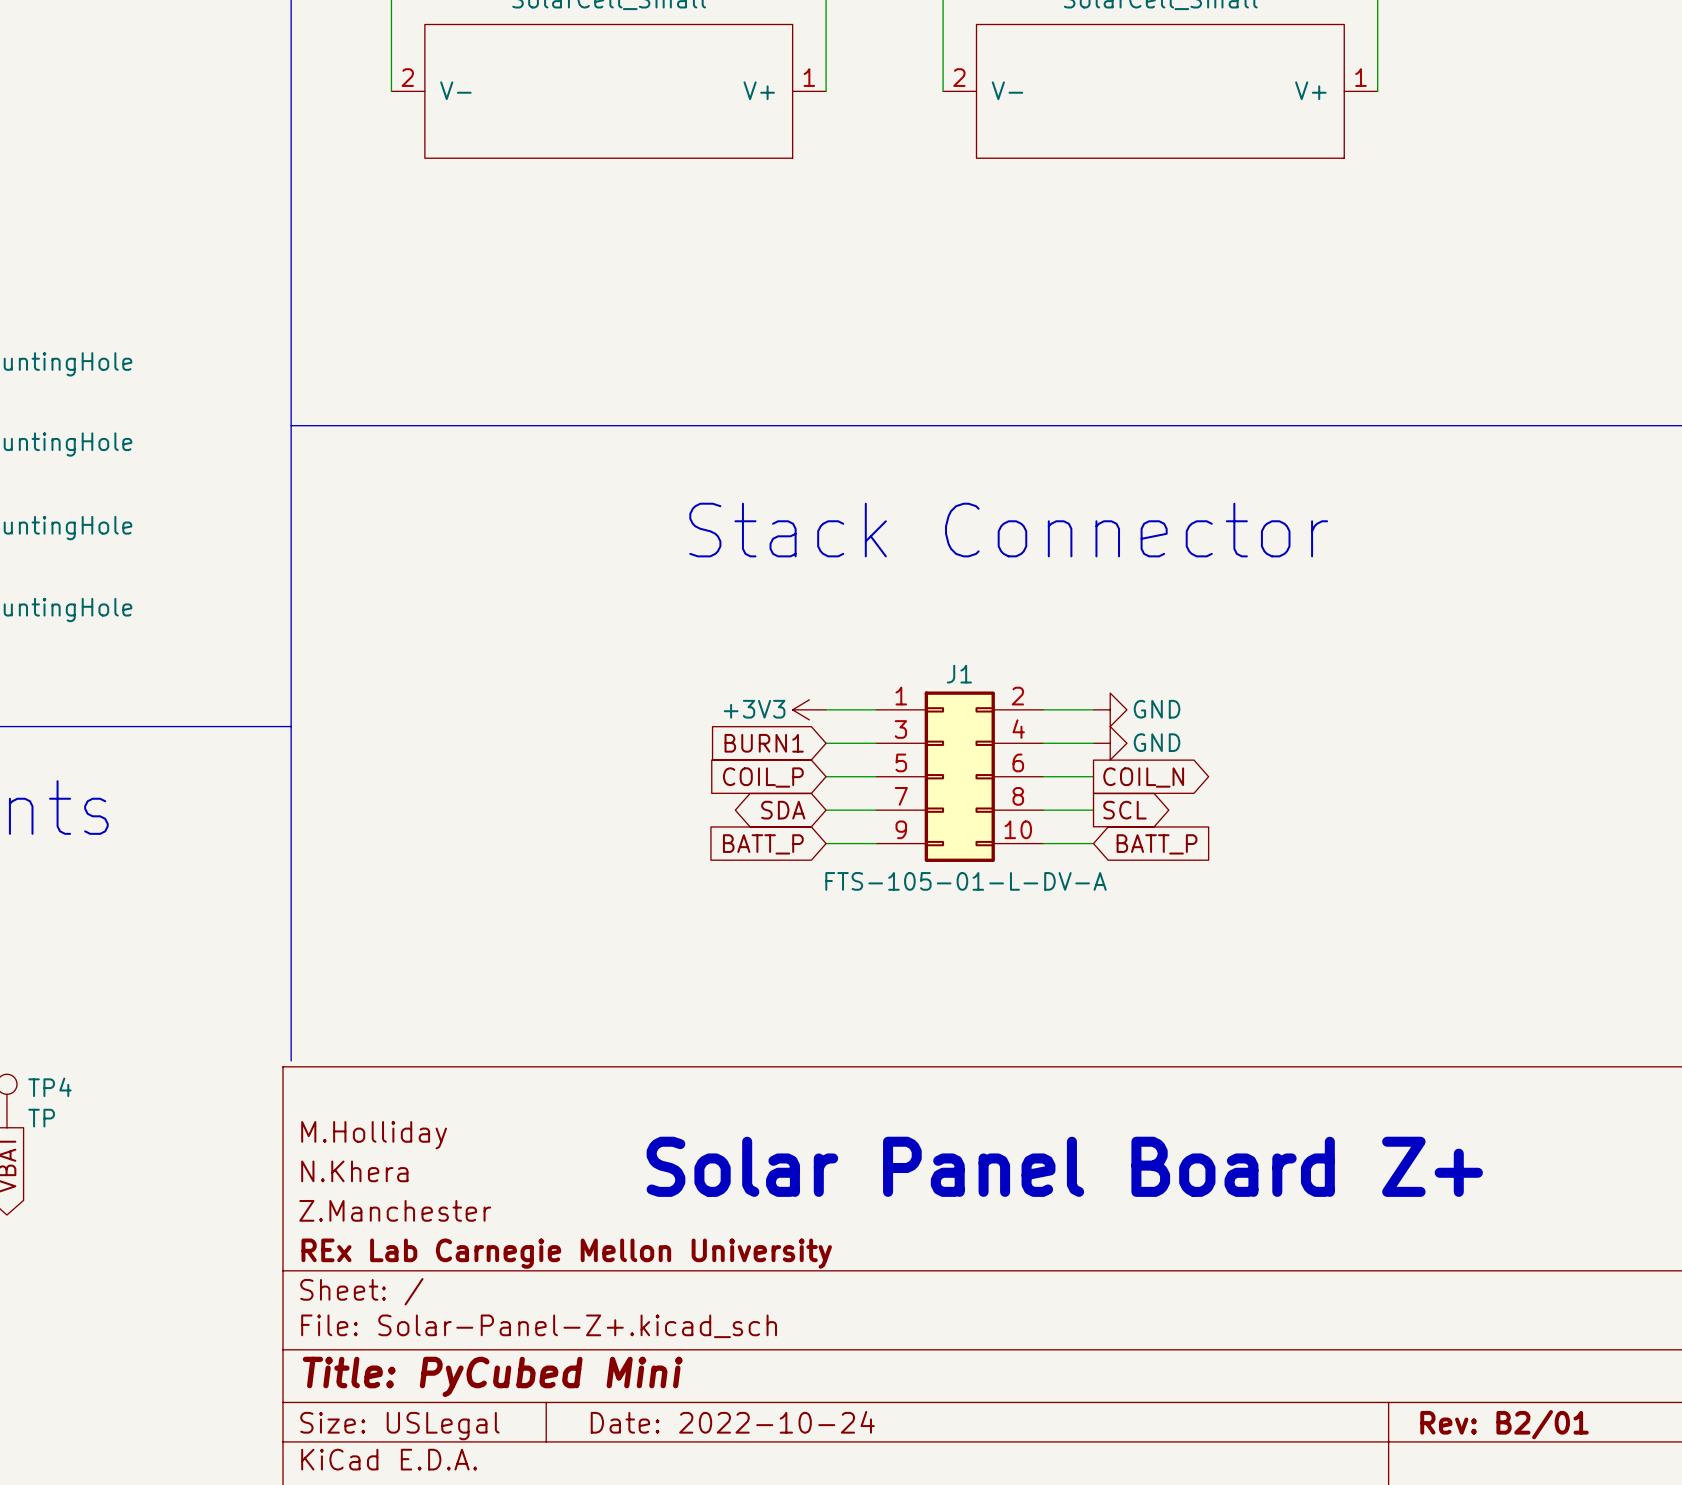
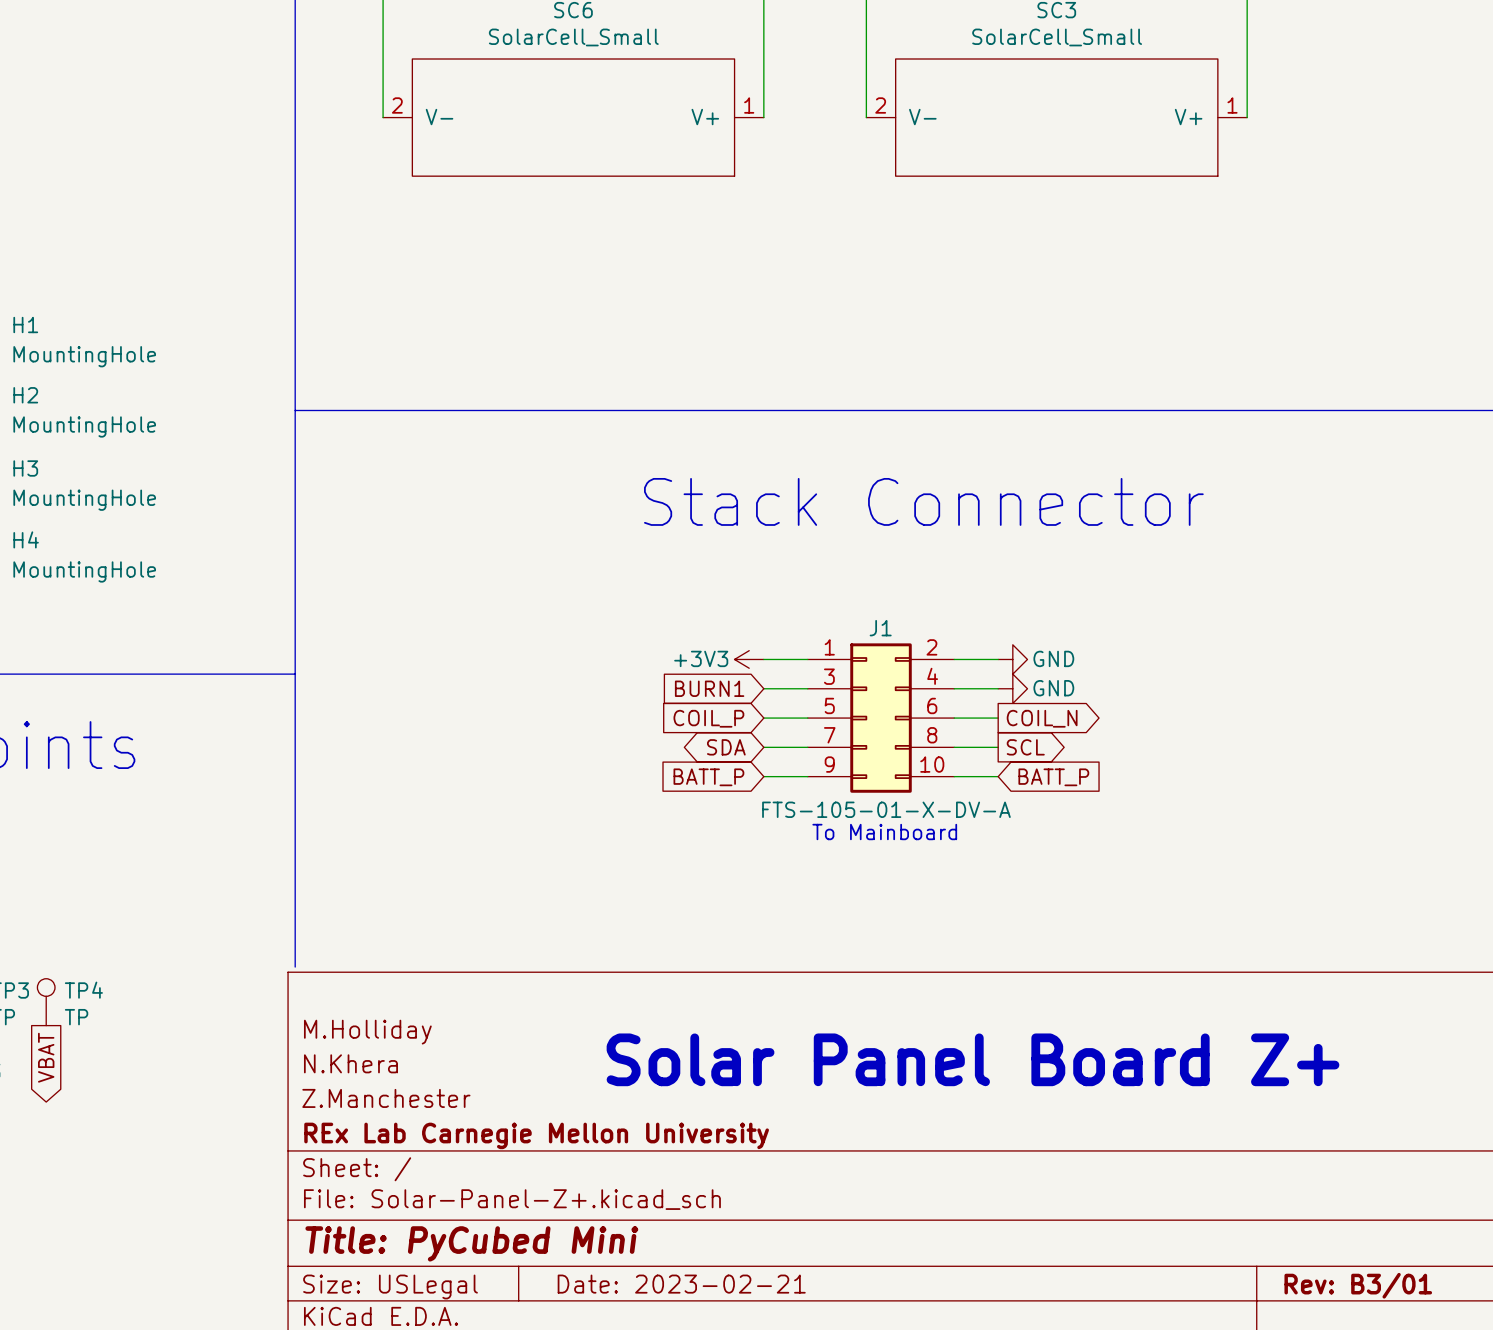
J1 value: FTS-105-01-L-DV-A (966, 881) -> FTS-105-01-X-DV-A (886, 809)
text: none -> To Mainboard (884, 832)
title block: Date: 2022-10-24 (732, 1422) -> Date: 2023-02-21 (681, 1284)
title block: Rev: B2/01 (1504, 1424) -> Rev: B3/01 (1358, 1285)

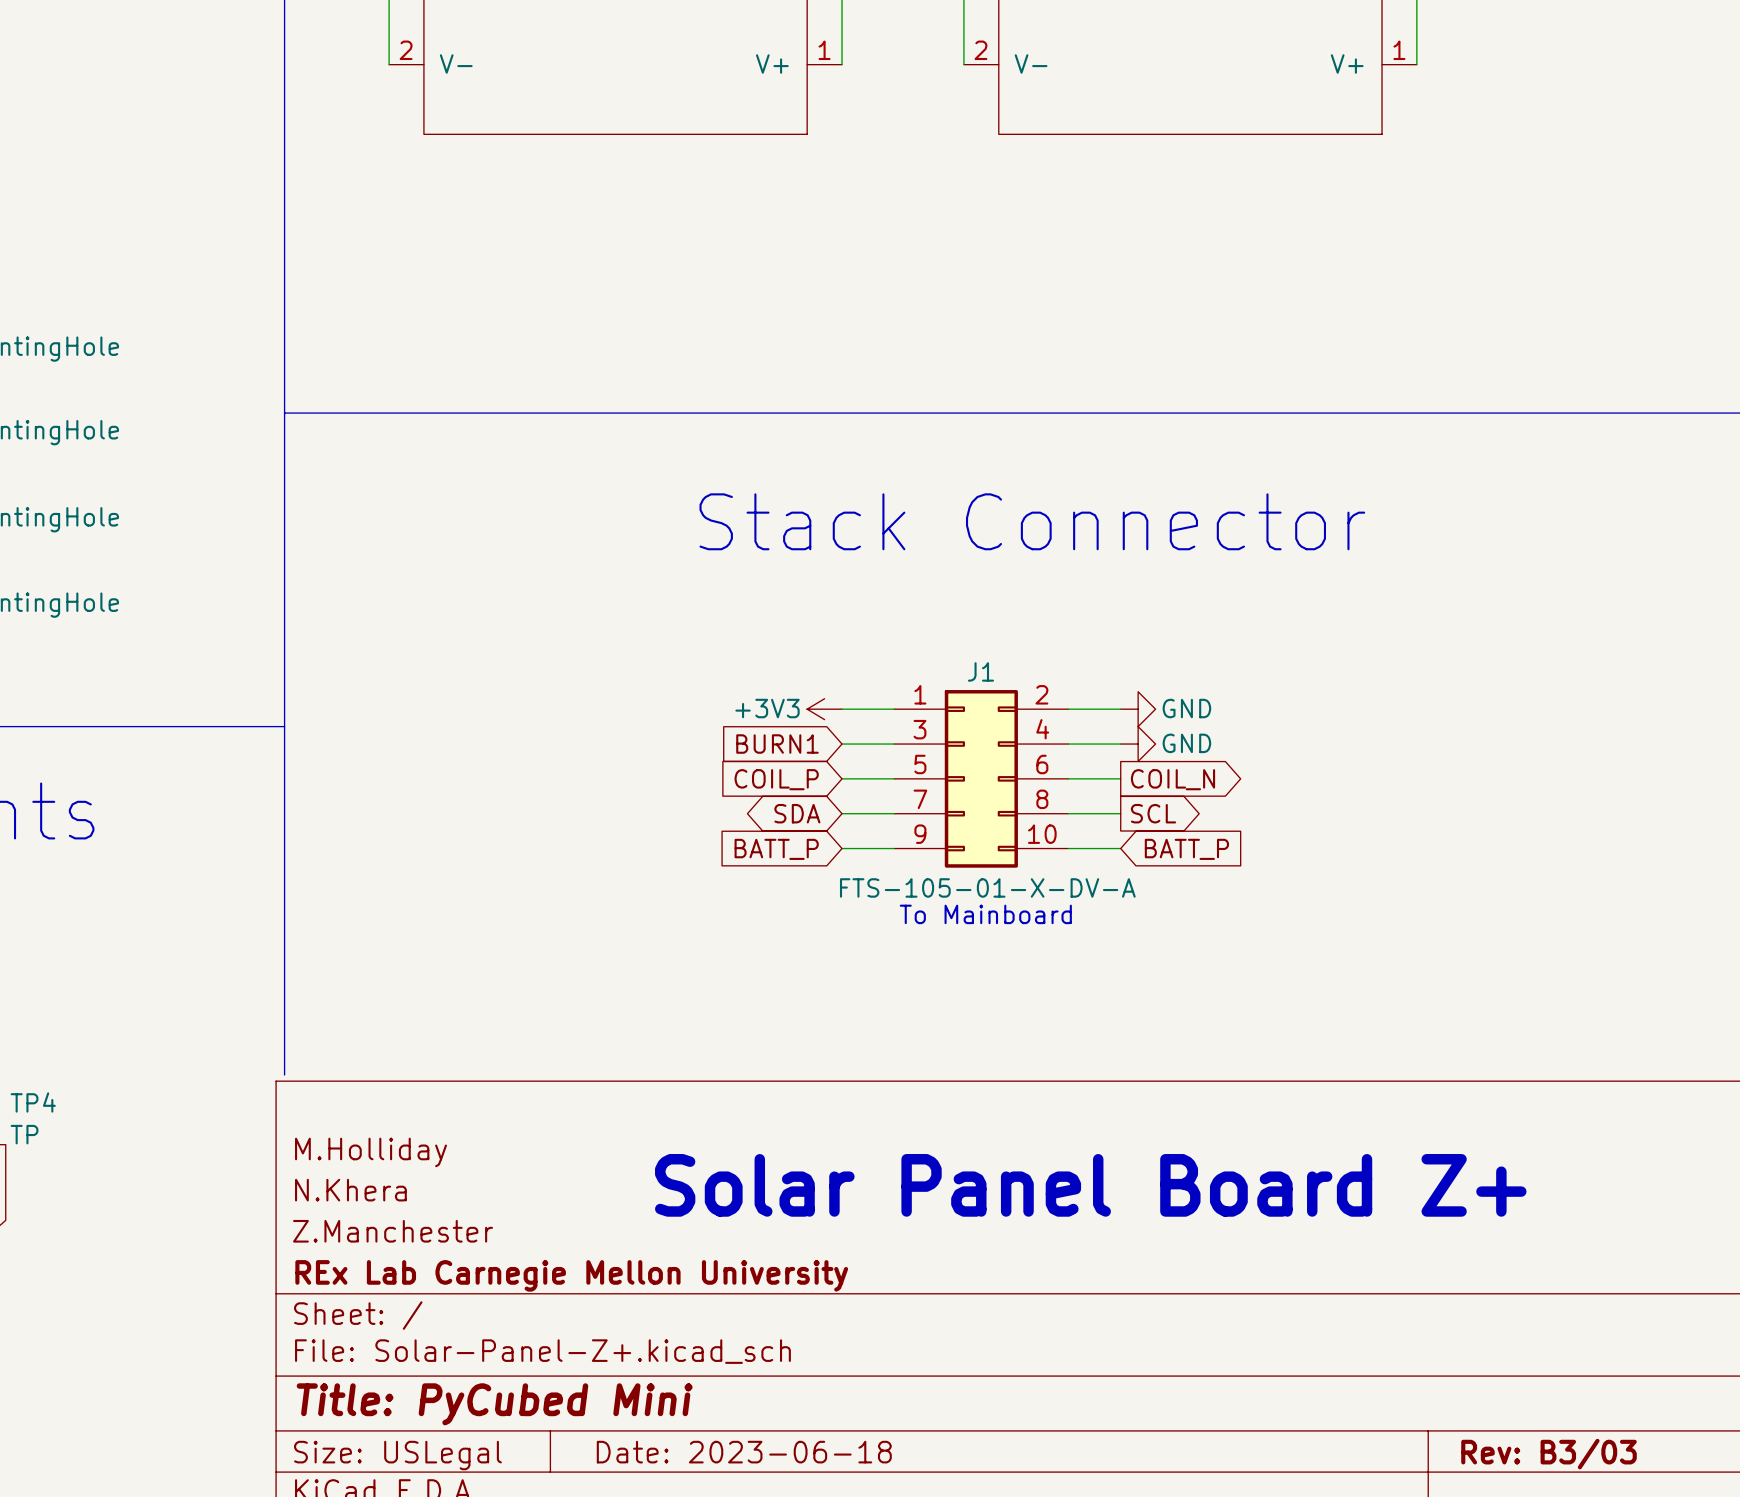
title block: Date: 2023-02-21 (681, 1284) -> Date: 2023-06-18 (744, 1452)
title block: Rev: B3/01 (1358, 1285) -> Rev: B3/03 (1549, 1454)

